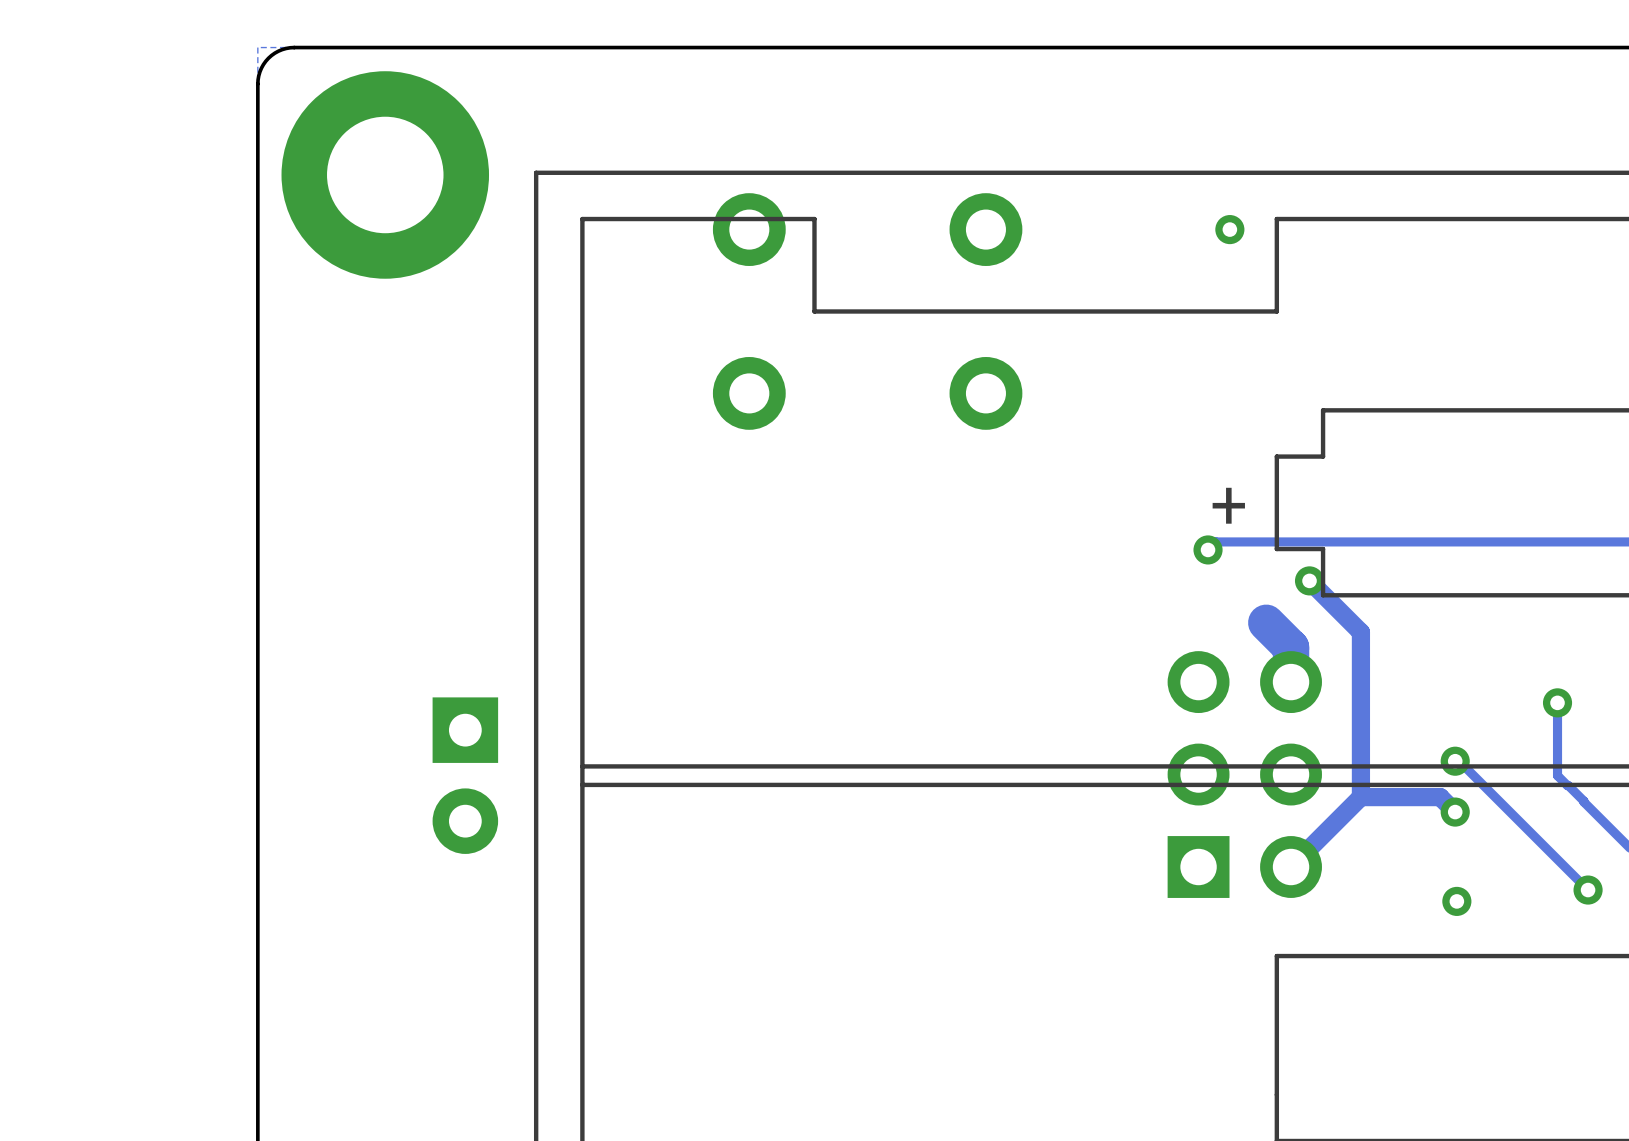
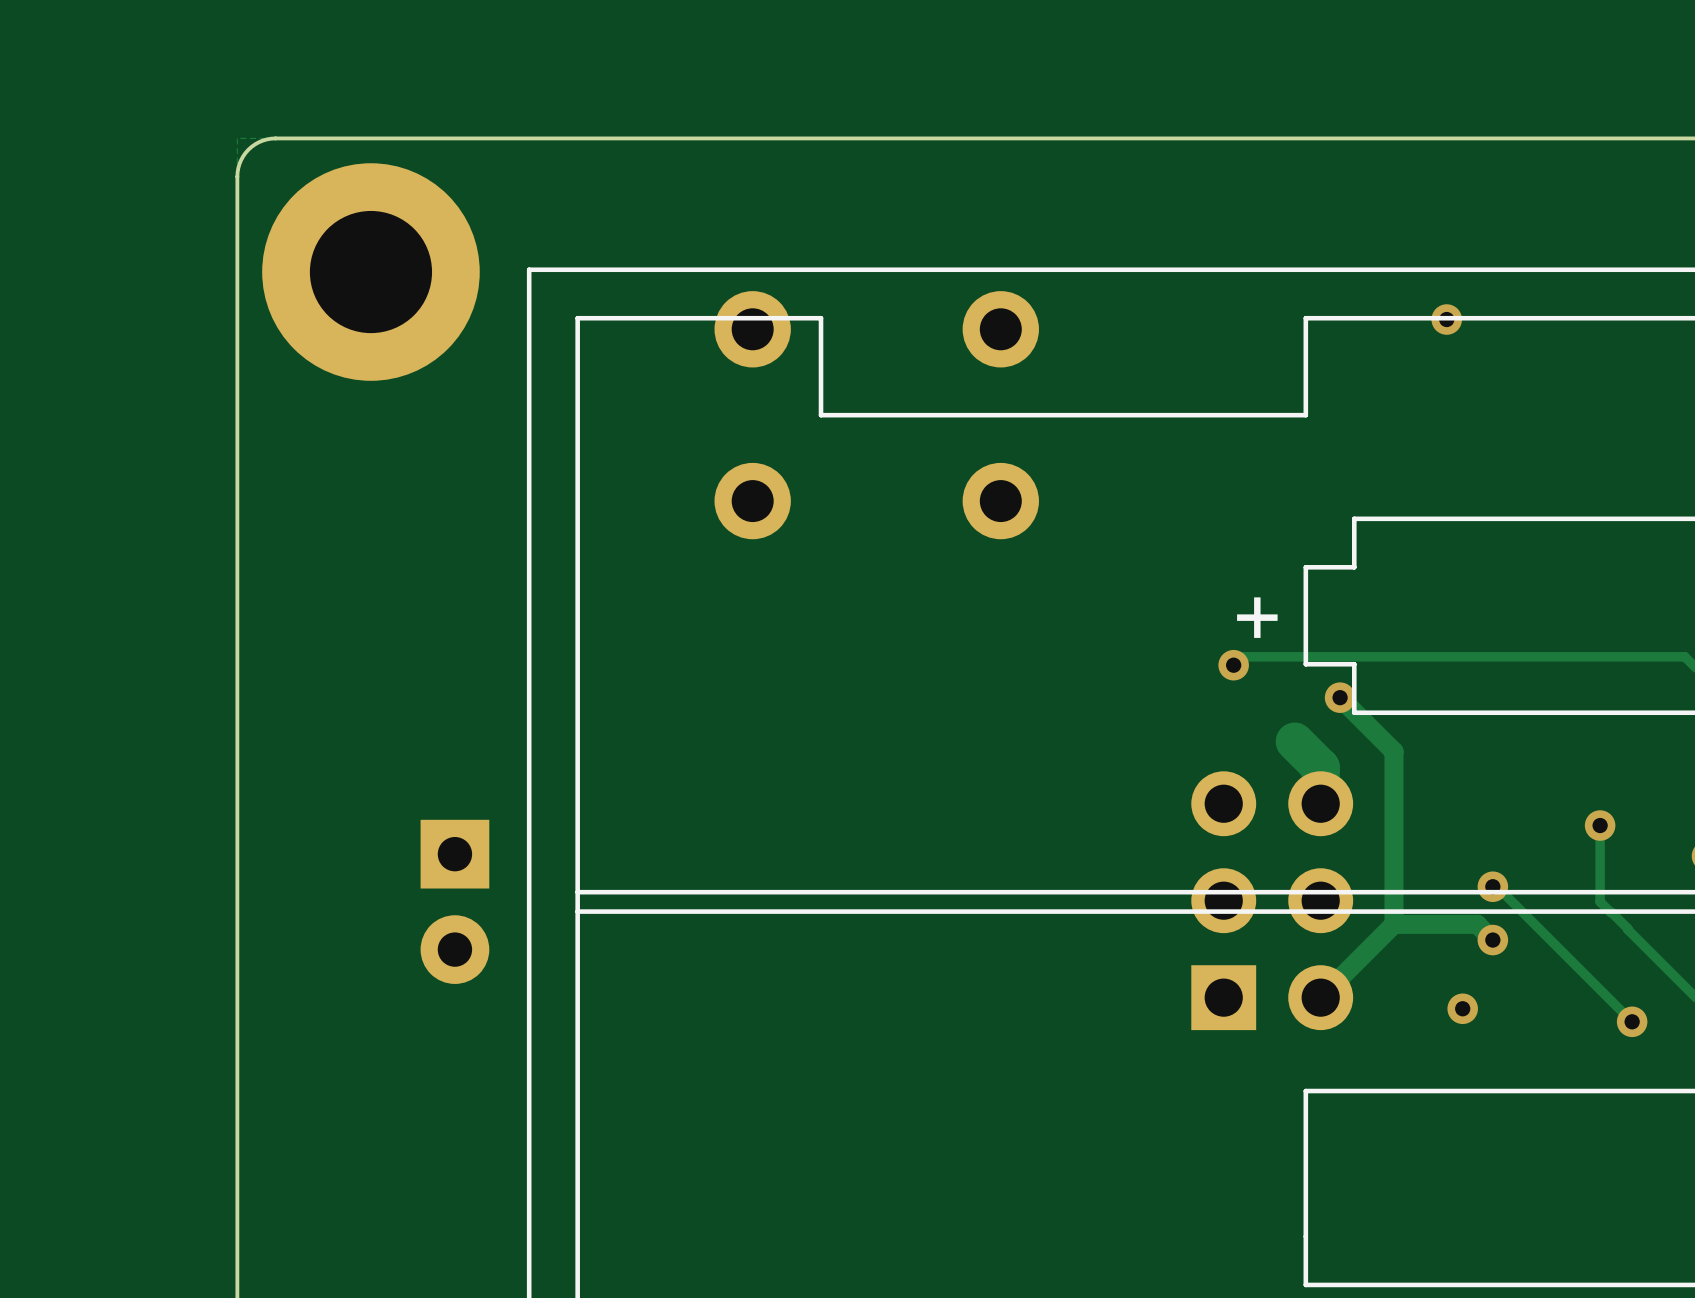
via position: (1229, 229) -> (1446, 319)
via position: (1456, 901) -> (1462, 1008)

